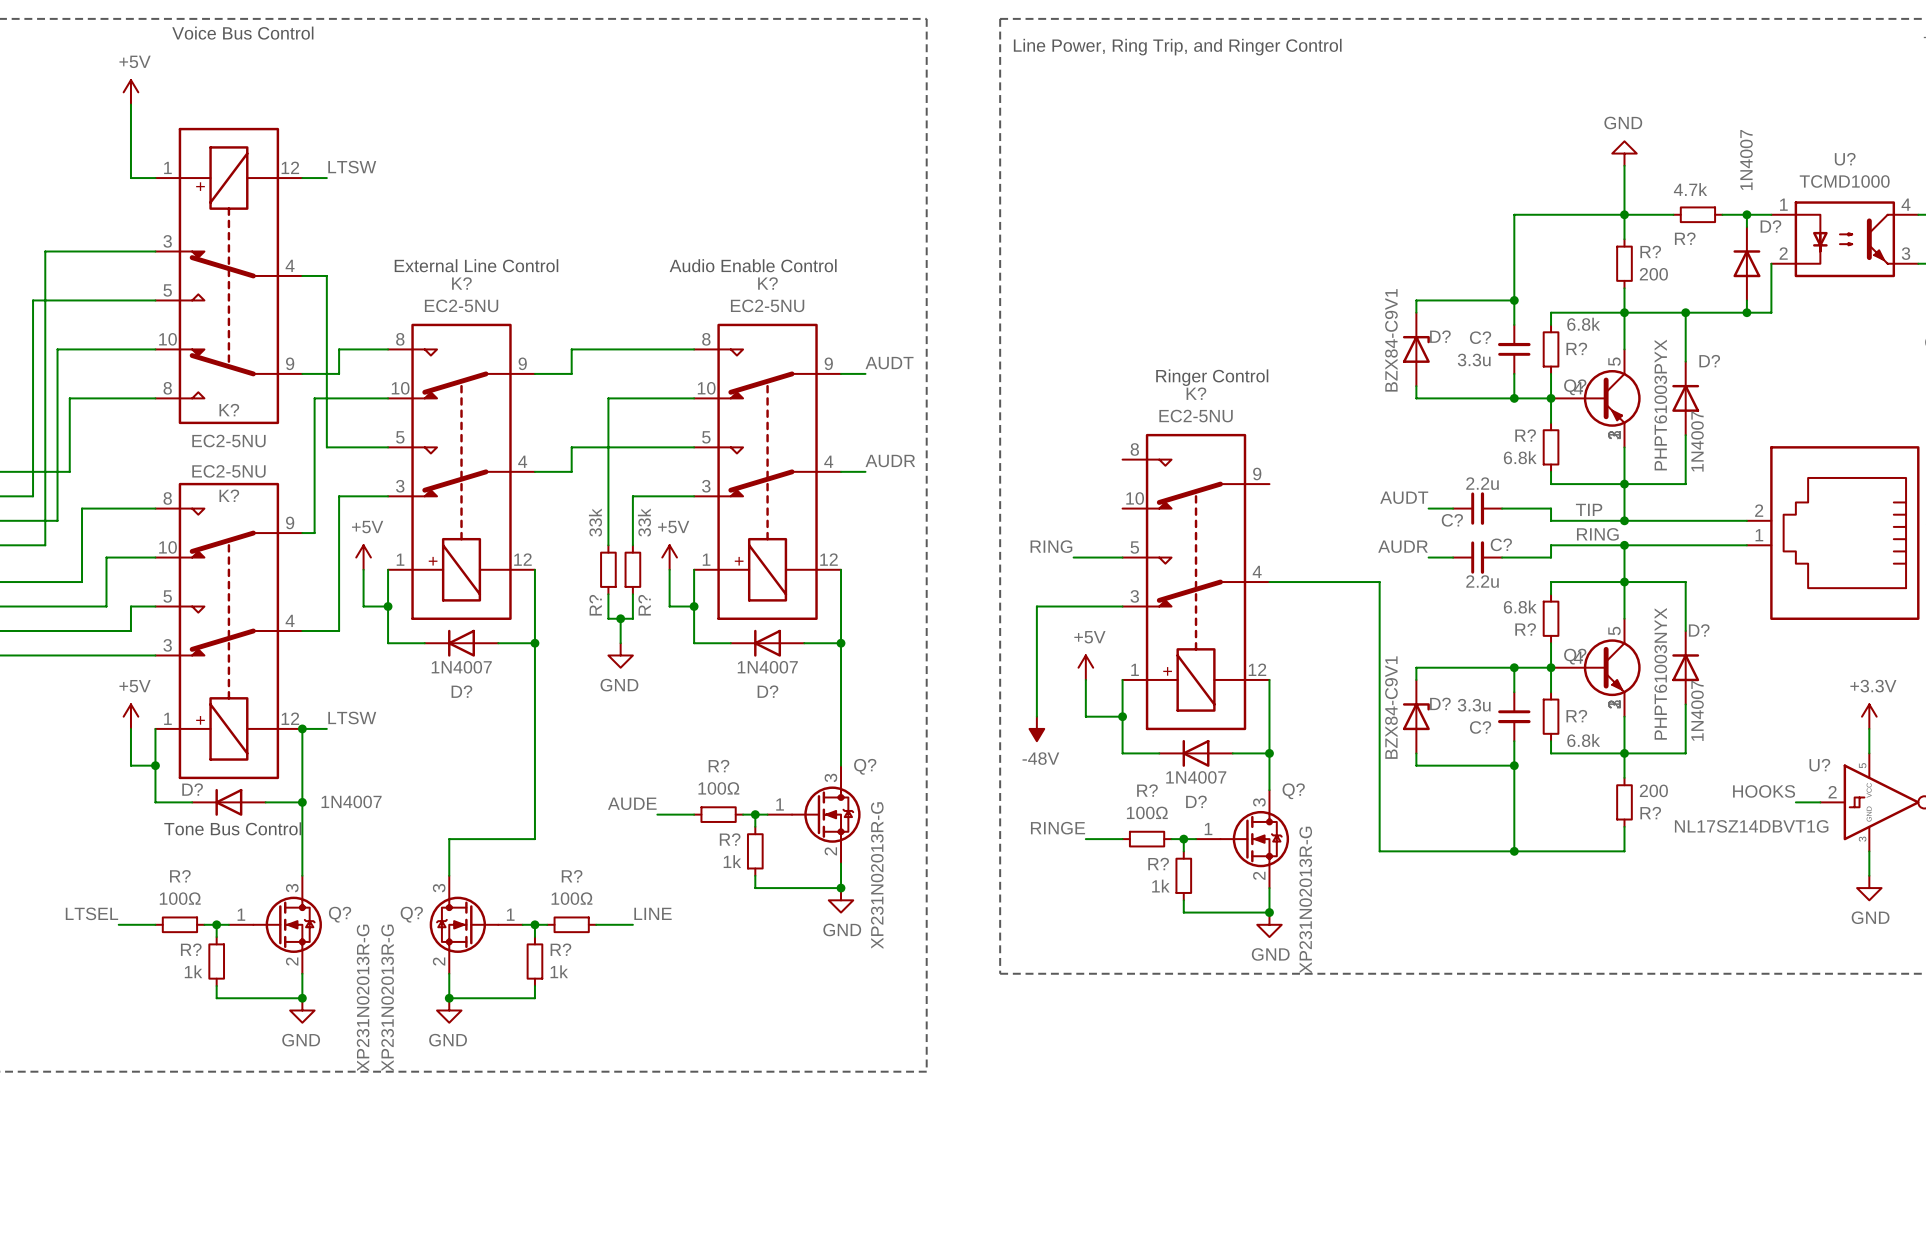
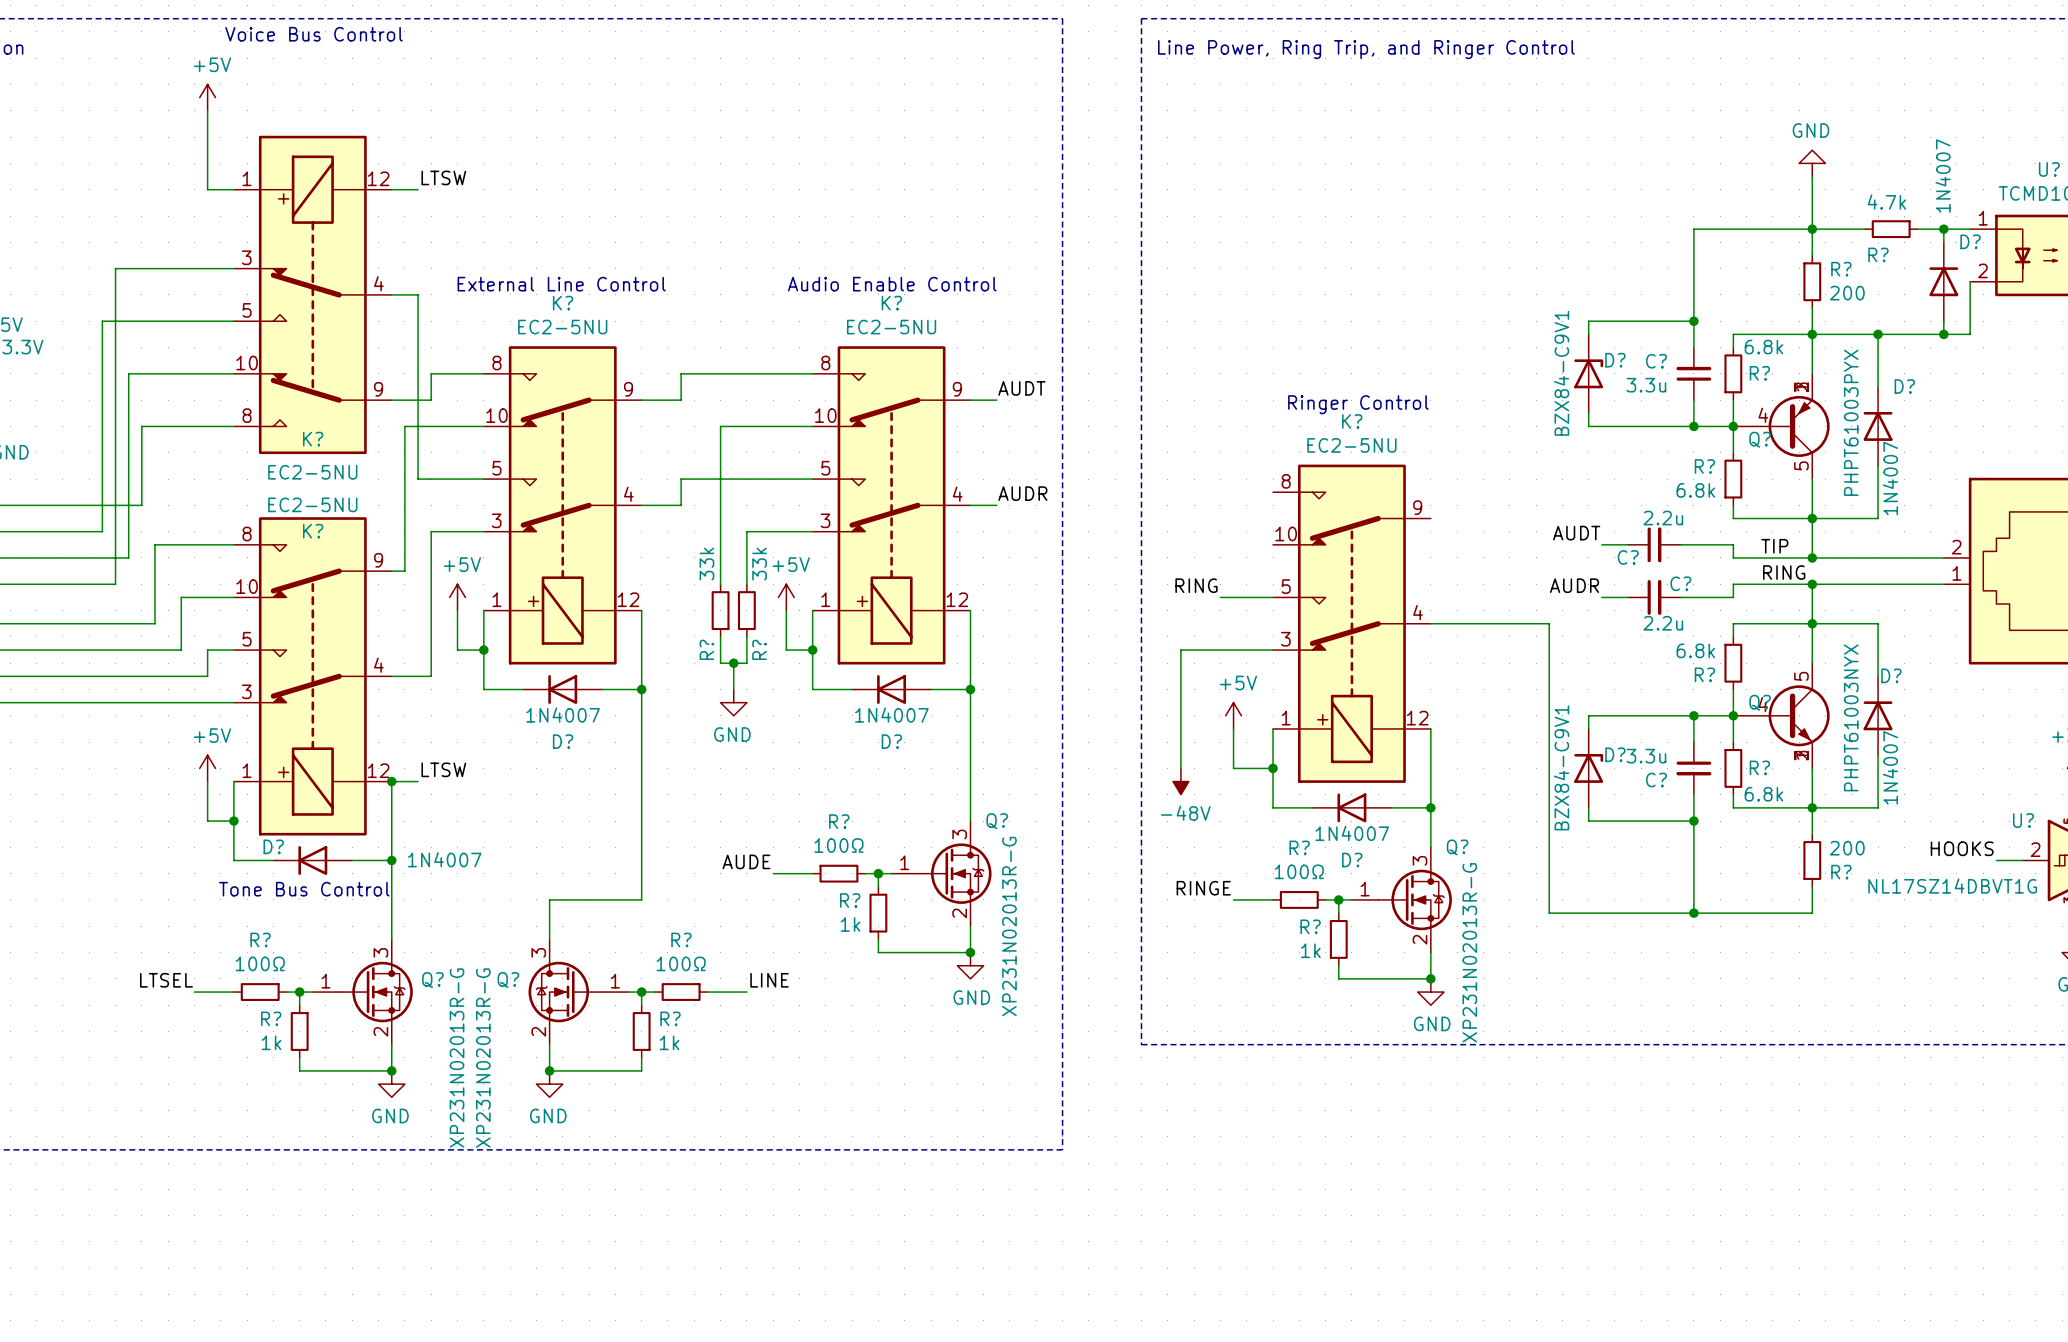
Q? flip: as is (1612, 398) -> up-down (1799, 426)

